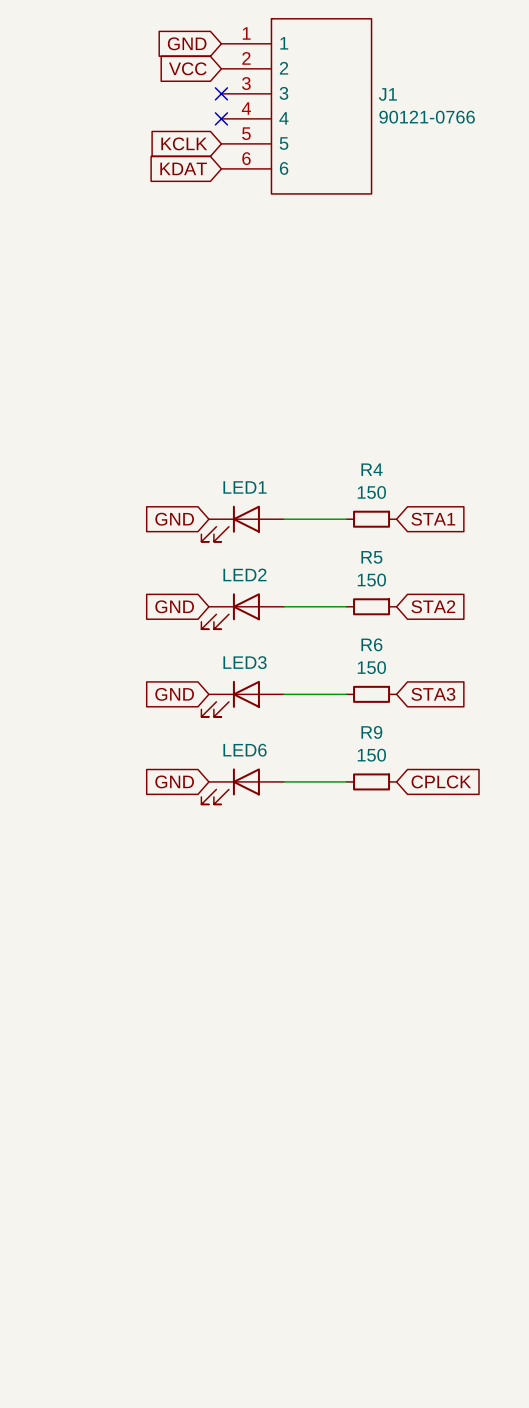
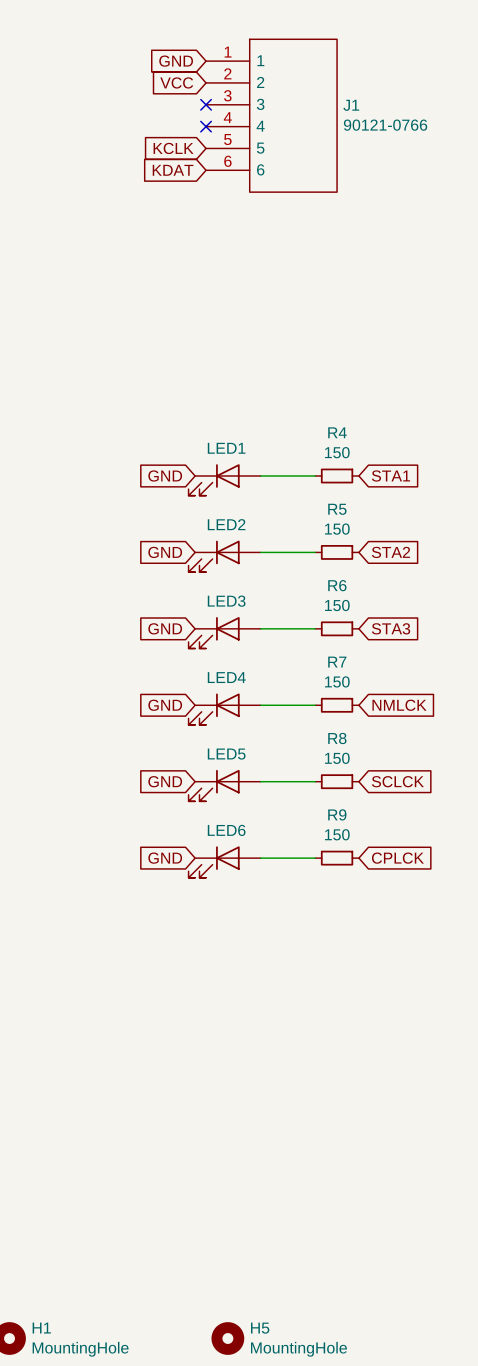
R9 name: R9 (371, 732) -> R7 (337, 662)
LED6 name: LED6 (245, 750) -> LED4 (226, 677)
global label: CPLCK (441, 781) -> NMLCK (399, 705)
global label: none -> GND (165, 781)
wire: none -> (260, 781) (315, 781)
R8: none -> 150 (337, 781)
global label: none -> SCLCK (397, 781)
LED5: none -> (224, 785)
global label: none -> GND (165, 858)
wire: none -> (260, 858) (315, 858)
R9: none -> 150 (337, 858)
global label: none -> CPLCK (397, 858)
LED6: none -> (224, 862)

